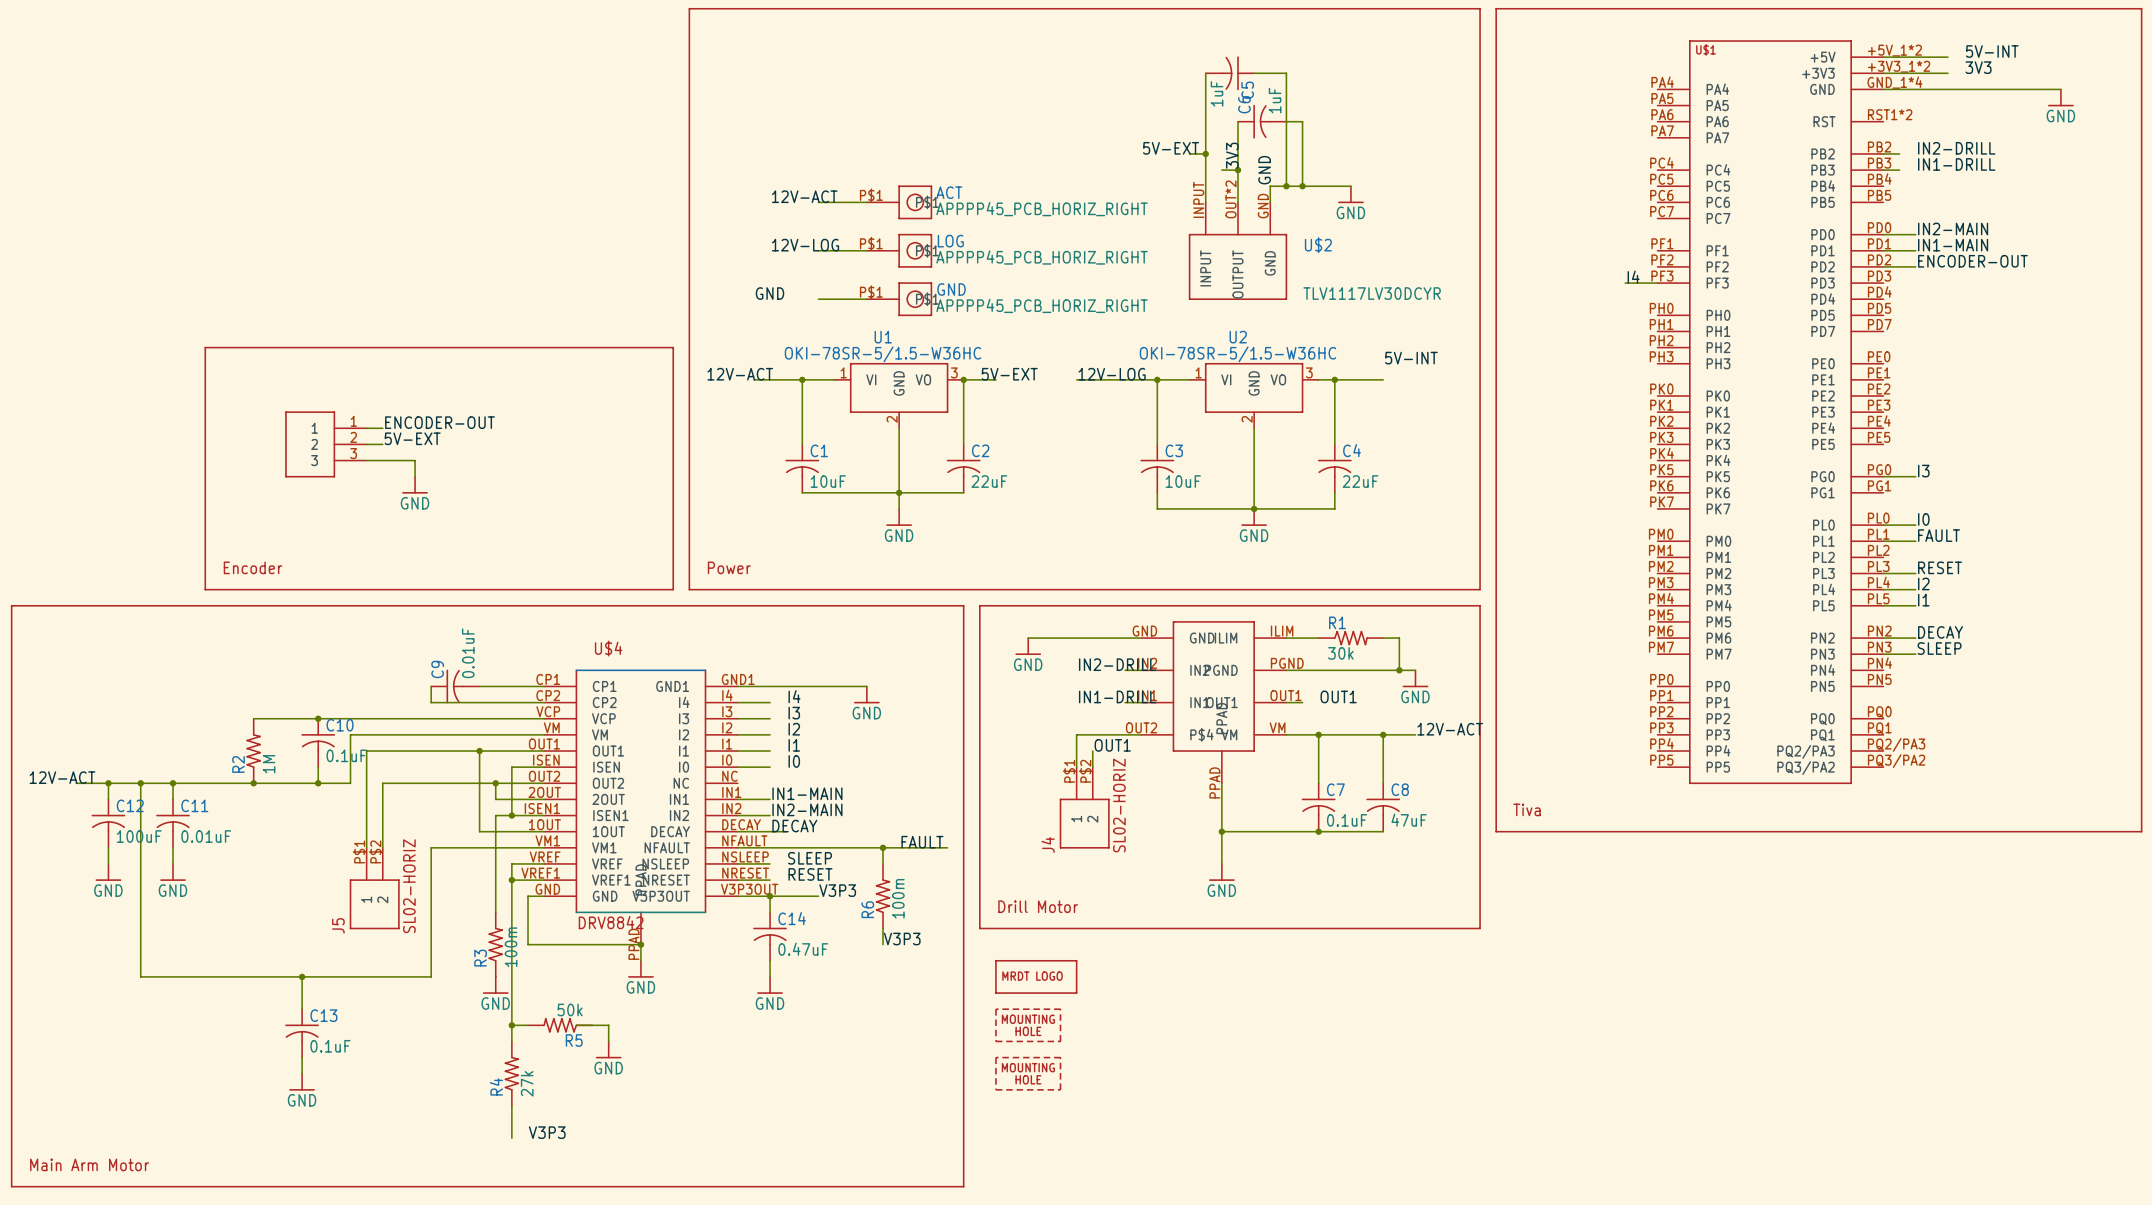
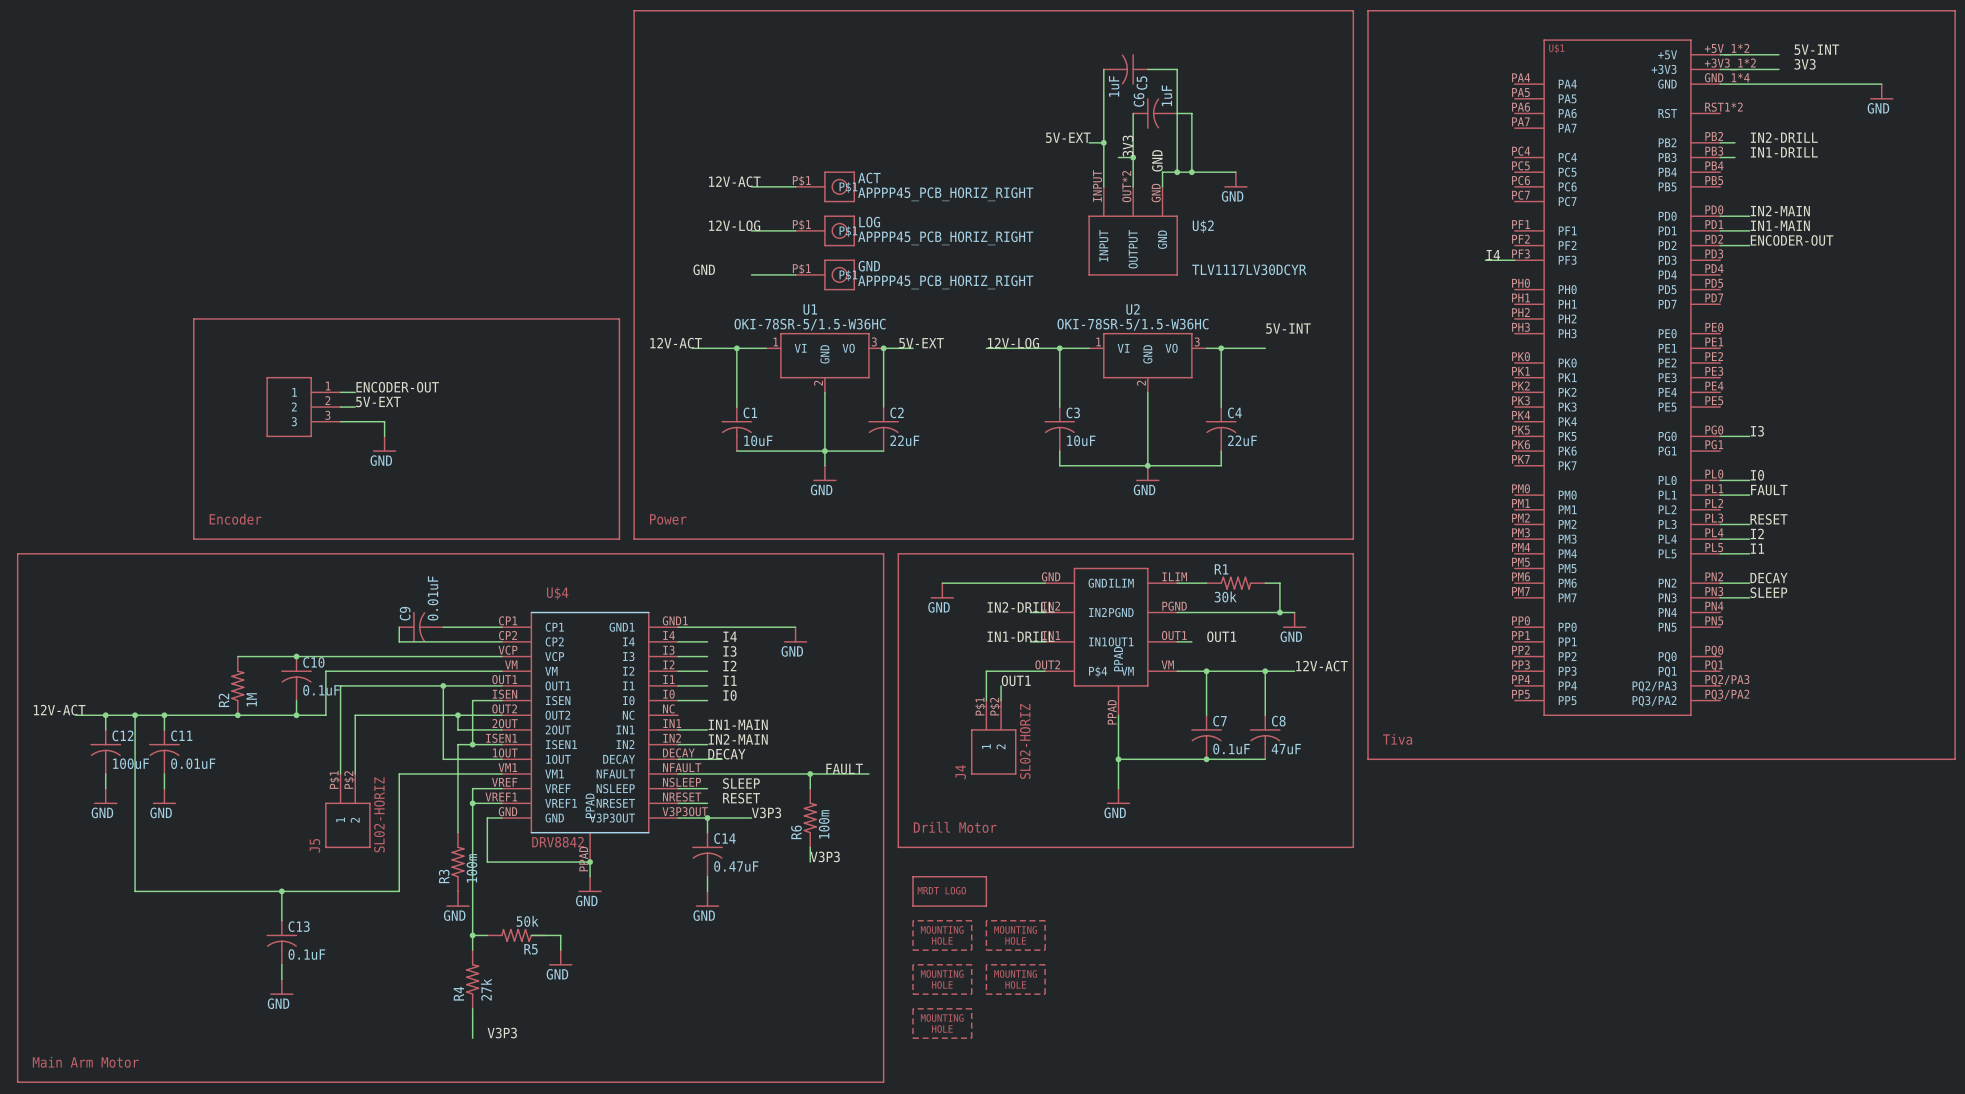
part: none -> (1015, 935)
part: none -> (1015, 979)
part: none -> (942, 1023)

